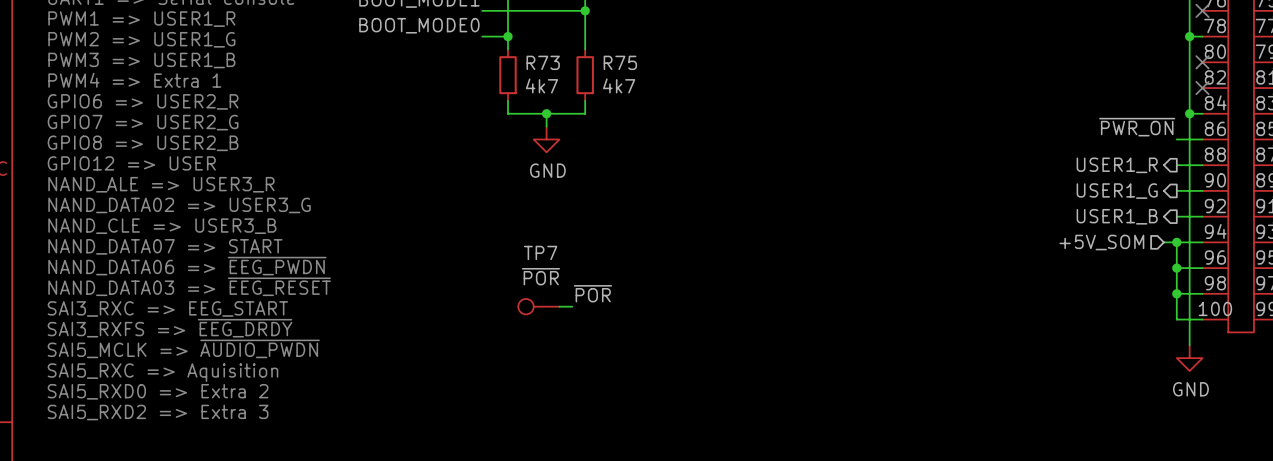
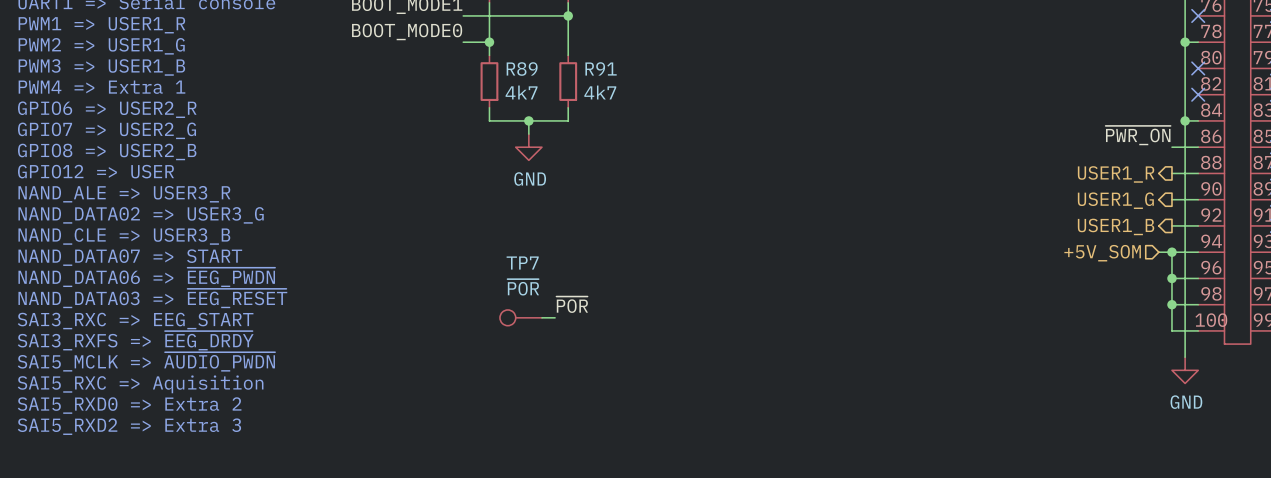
R73 name: R73 (543, 62) -> R89 (522, 69)
R75 name: R75 (620, 62) -> R91 (601, 68)

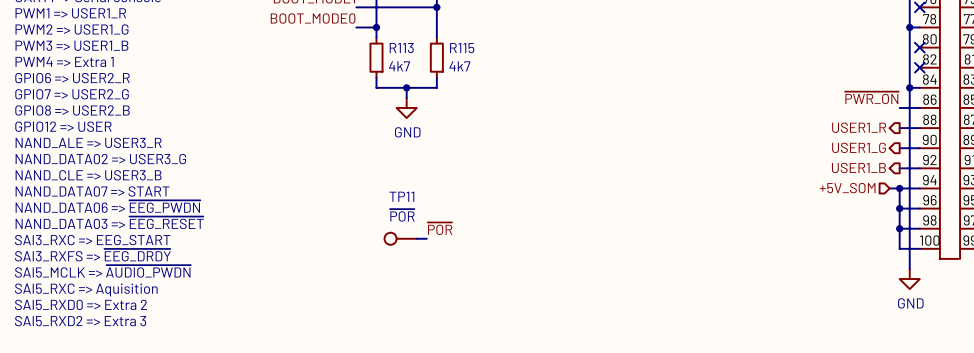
R91 name: R91 (601, 68) -> R115 (462, 48)
R89 name: R89 (522, 69) -> R113 (401, 48)
TP7 name: TP7 (522, 263) -> TP11 (401, 196)

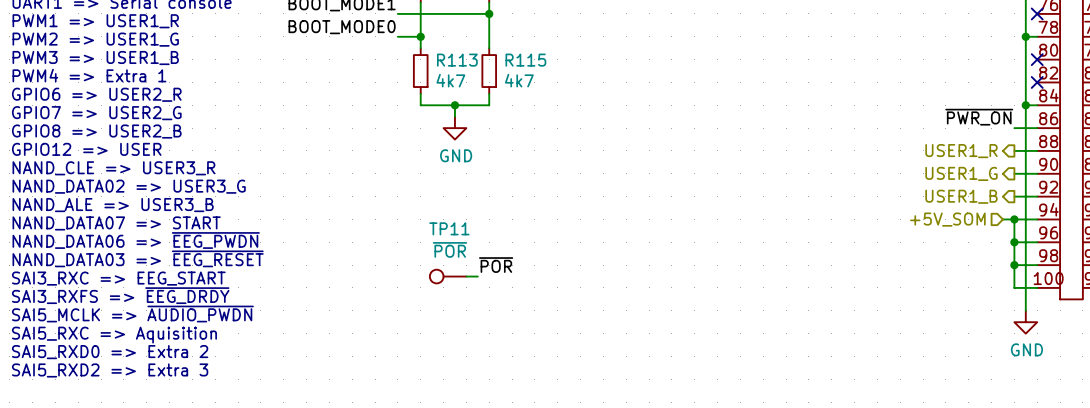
text: NAND_ALE => USER3_R (88, 142) -> NAND_CLE => USER3_R (113, 168)
text: NAND_CLE => USER3_B (88, 175) -> NAND_ALE => USER3_B (113, 205)

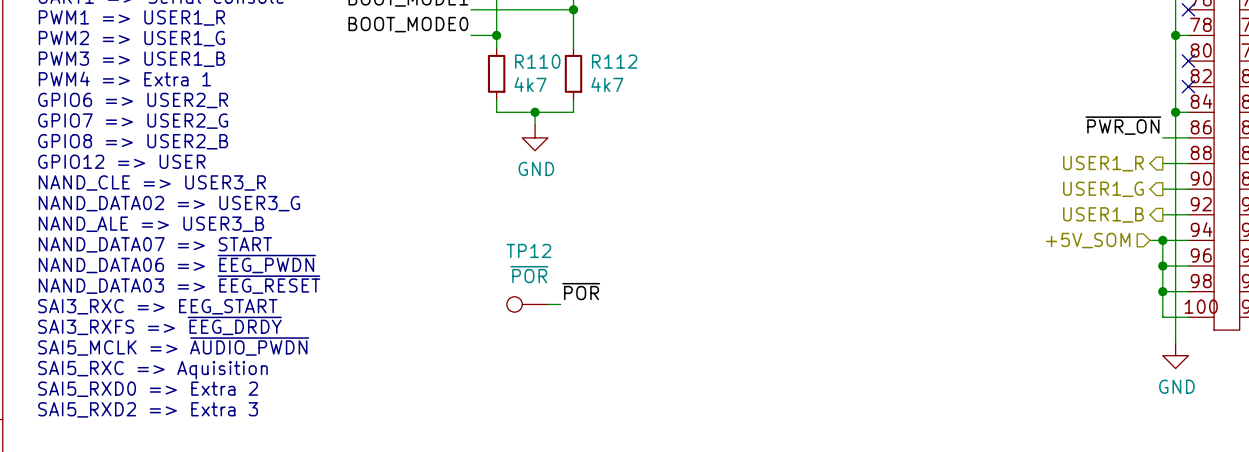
R113 name: R113 (457, 60) -> R110 (537, 61)
R115 name: R115 (525, 60) -> R112 (614, 61)
TP11 name: TP11 (449, 228) -> TP12 (528, 250)

